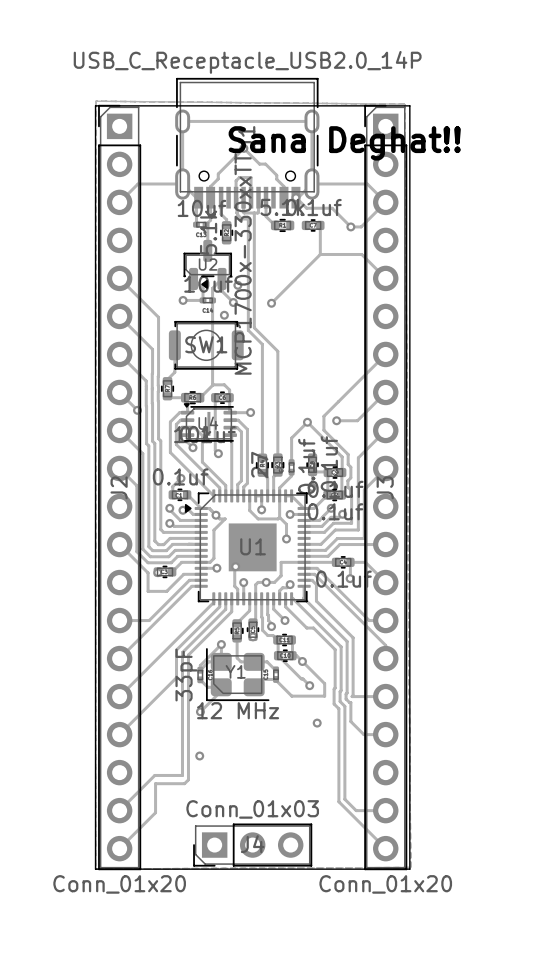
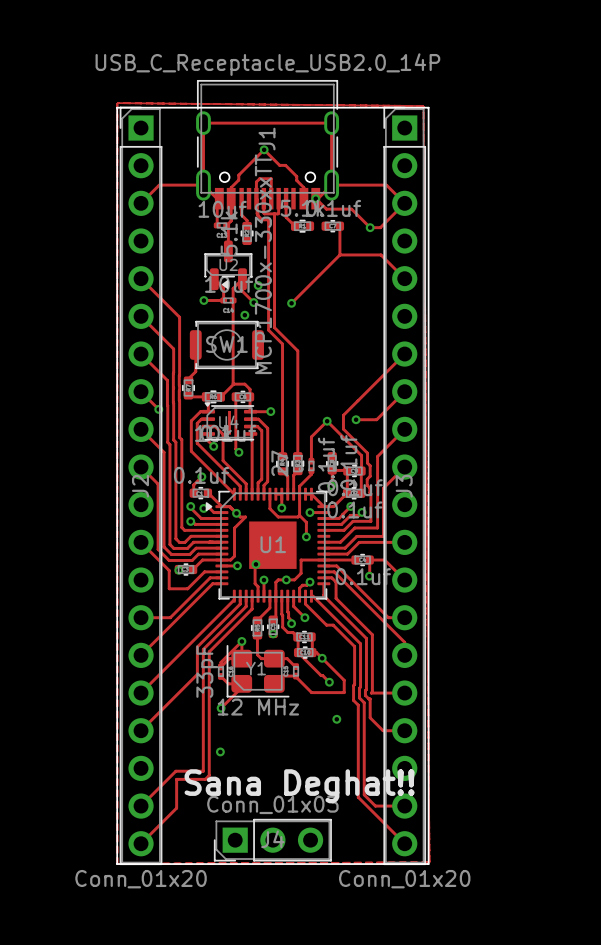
text: Sana Deghat!! (344, 143) -> none
text: none -> Sana Deghat!! (299, 786)

